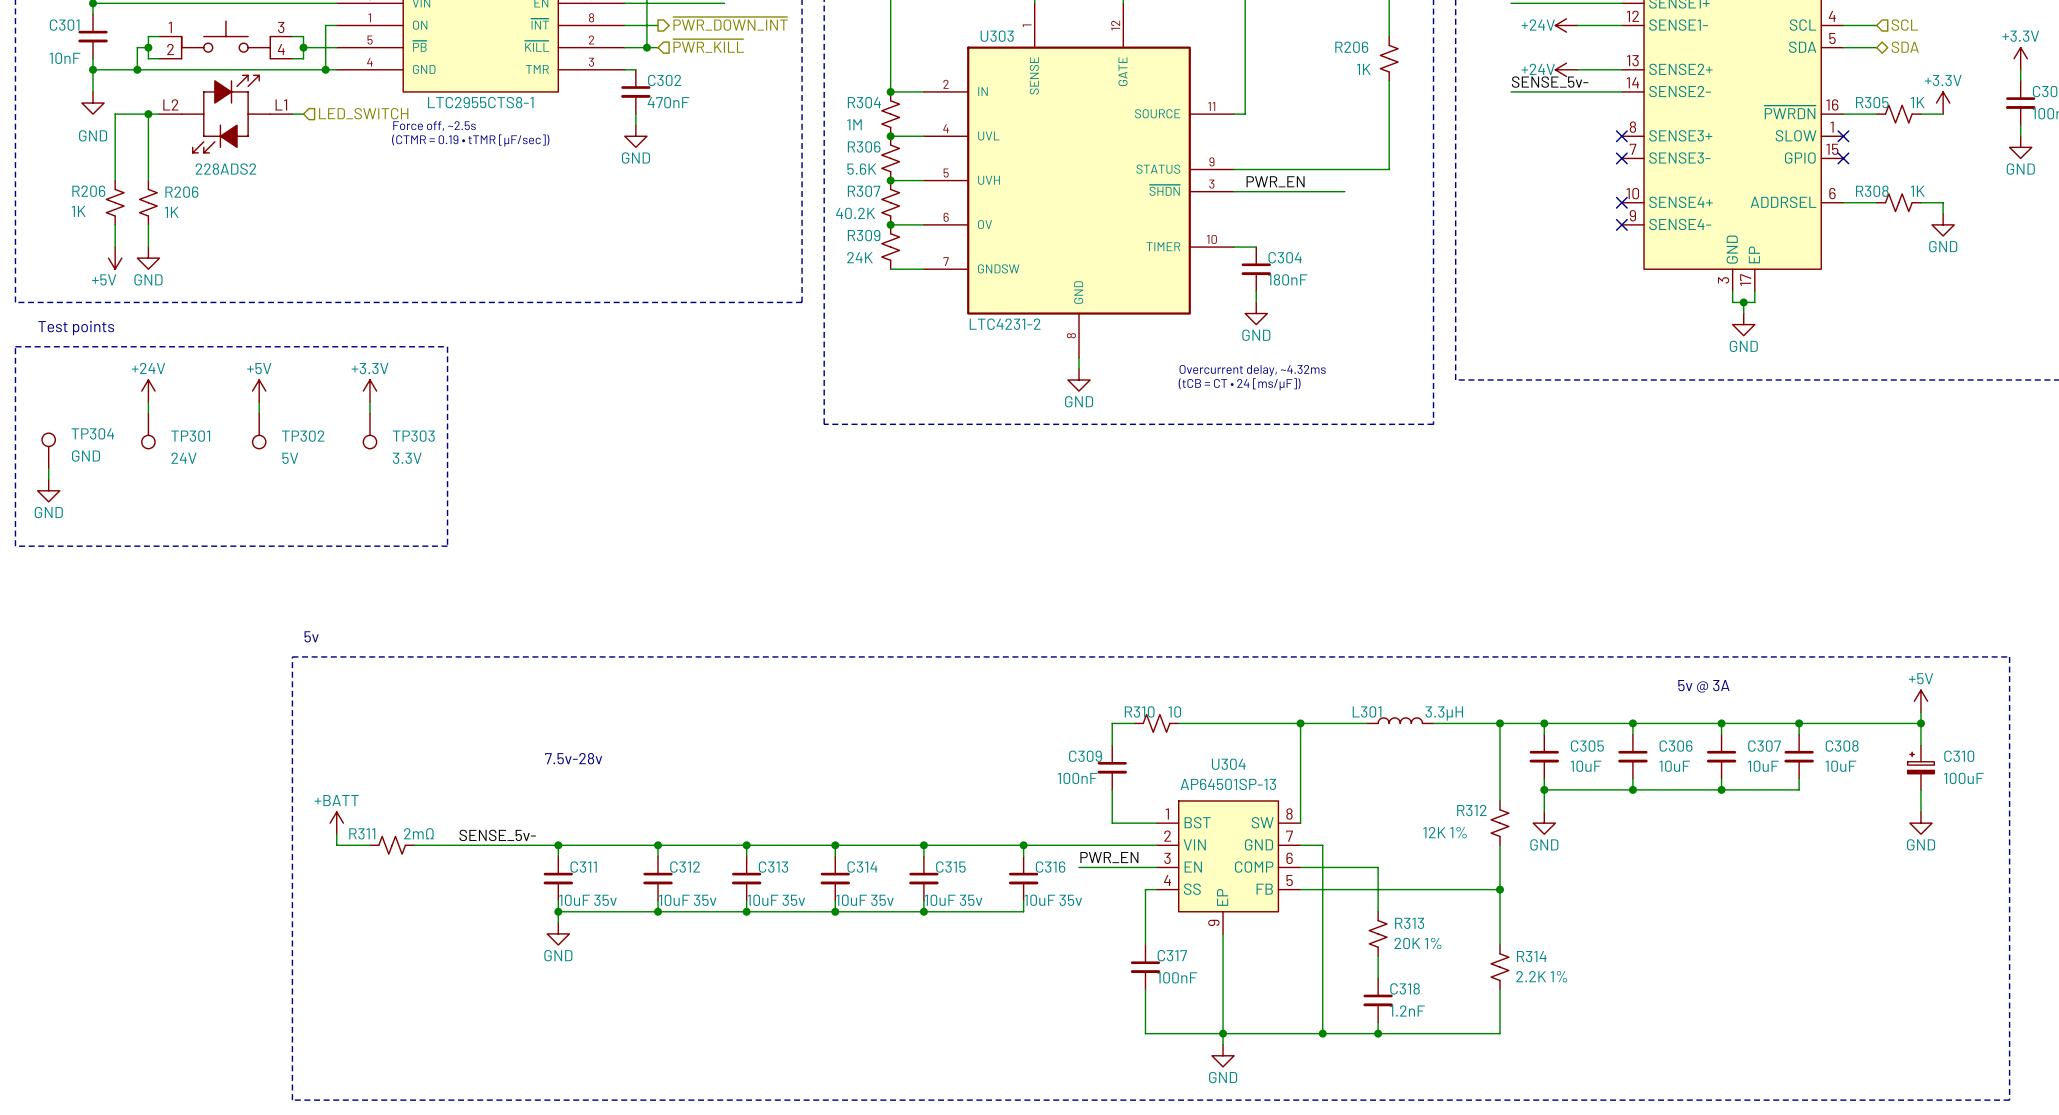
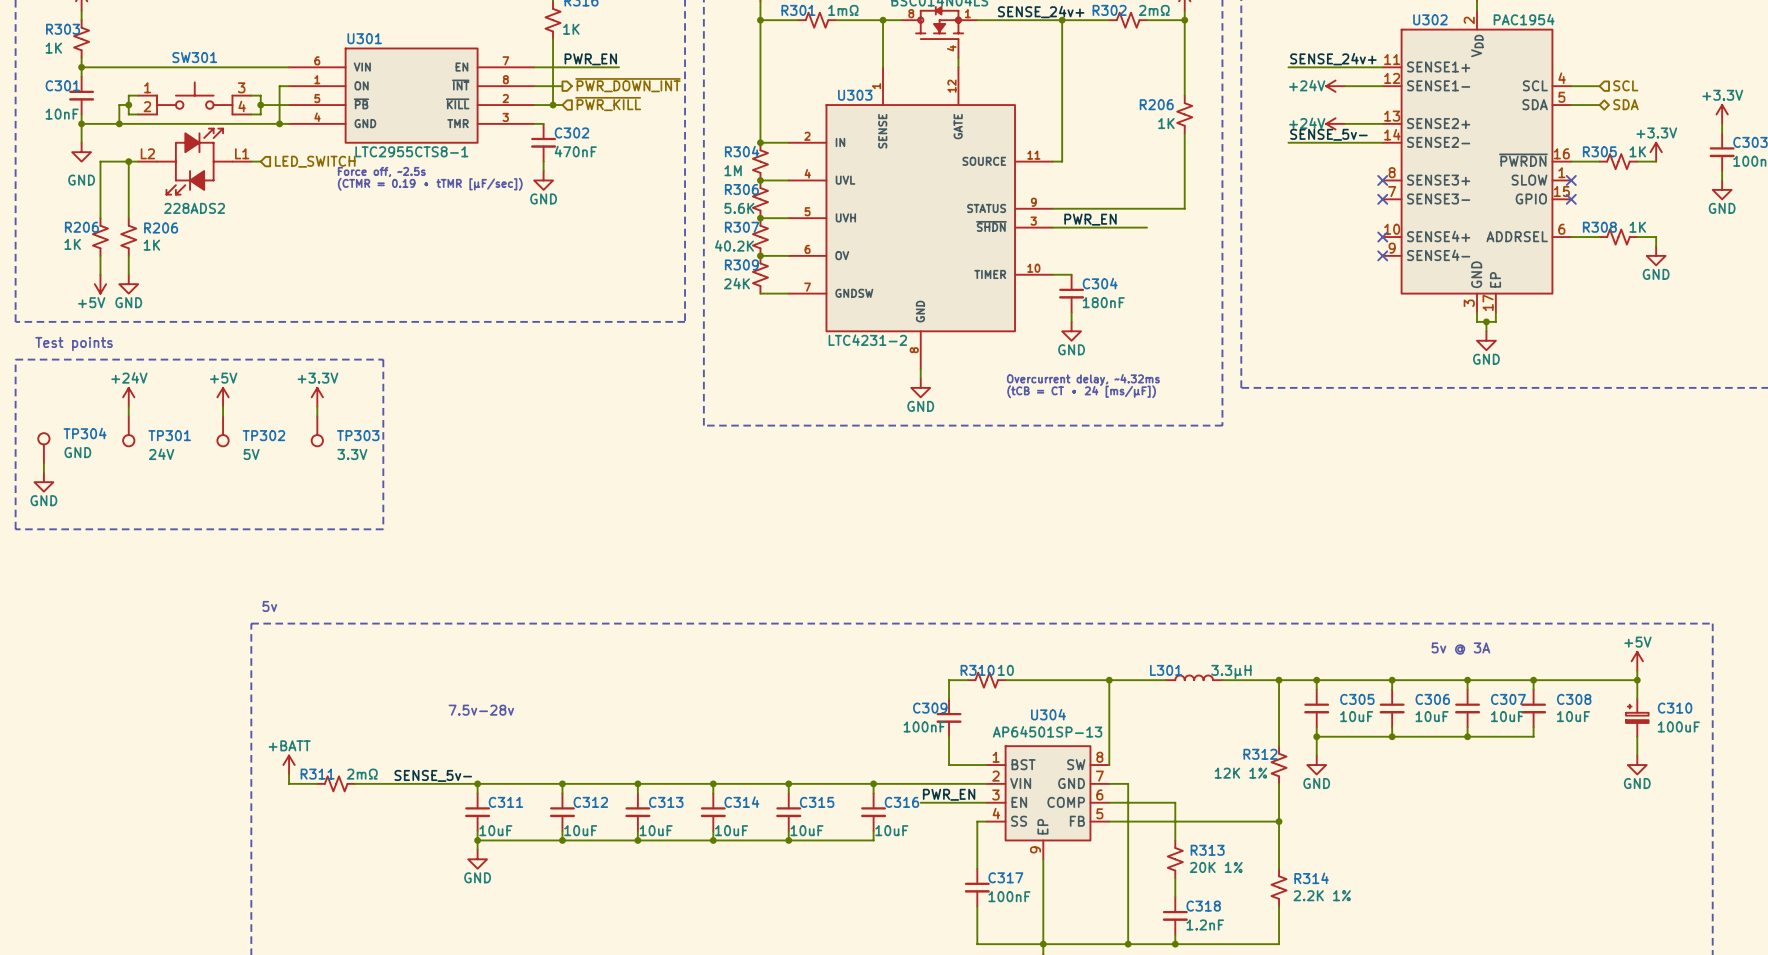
C311 value: 10uF 35v (588, 900) -> 10uF (495, 830)
C312 value: 10uF 35v (687, 900) -> 10uF (580, 830)
C313 value: 10uF 35v (776, 900) -> 10uF (656, 830)
C314 value: 10uF 35v (864, 900) -> 10uF (731, 830)
C315 value: 10uF 35v (953, 900) -> 10uF (806, 830)
C316 value: 10uF 35v (1053, 900) -> 10uF (891, 830)

